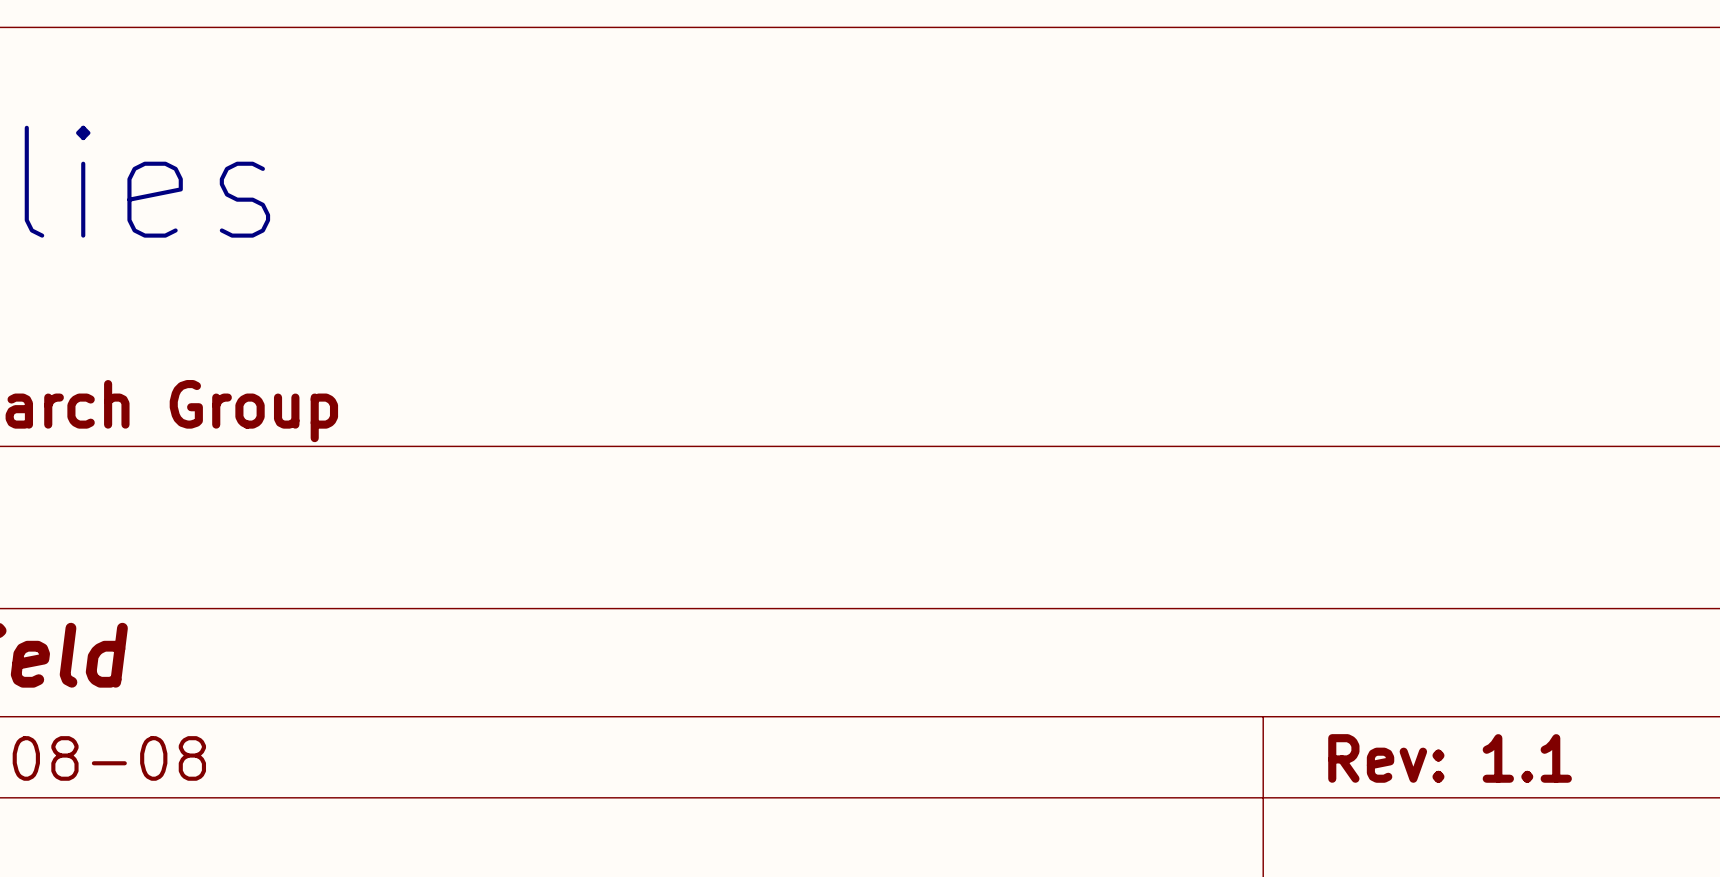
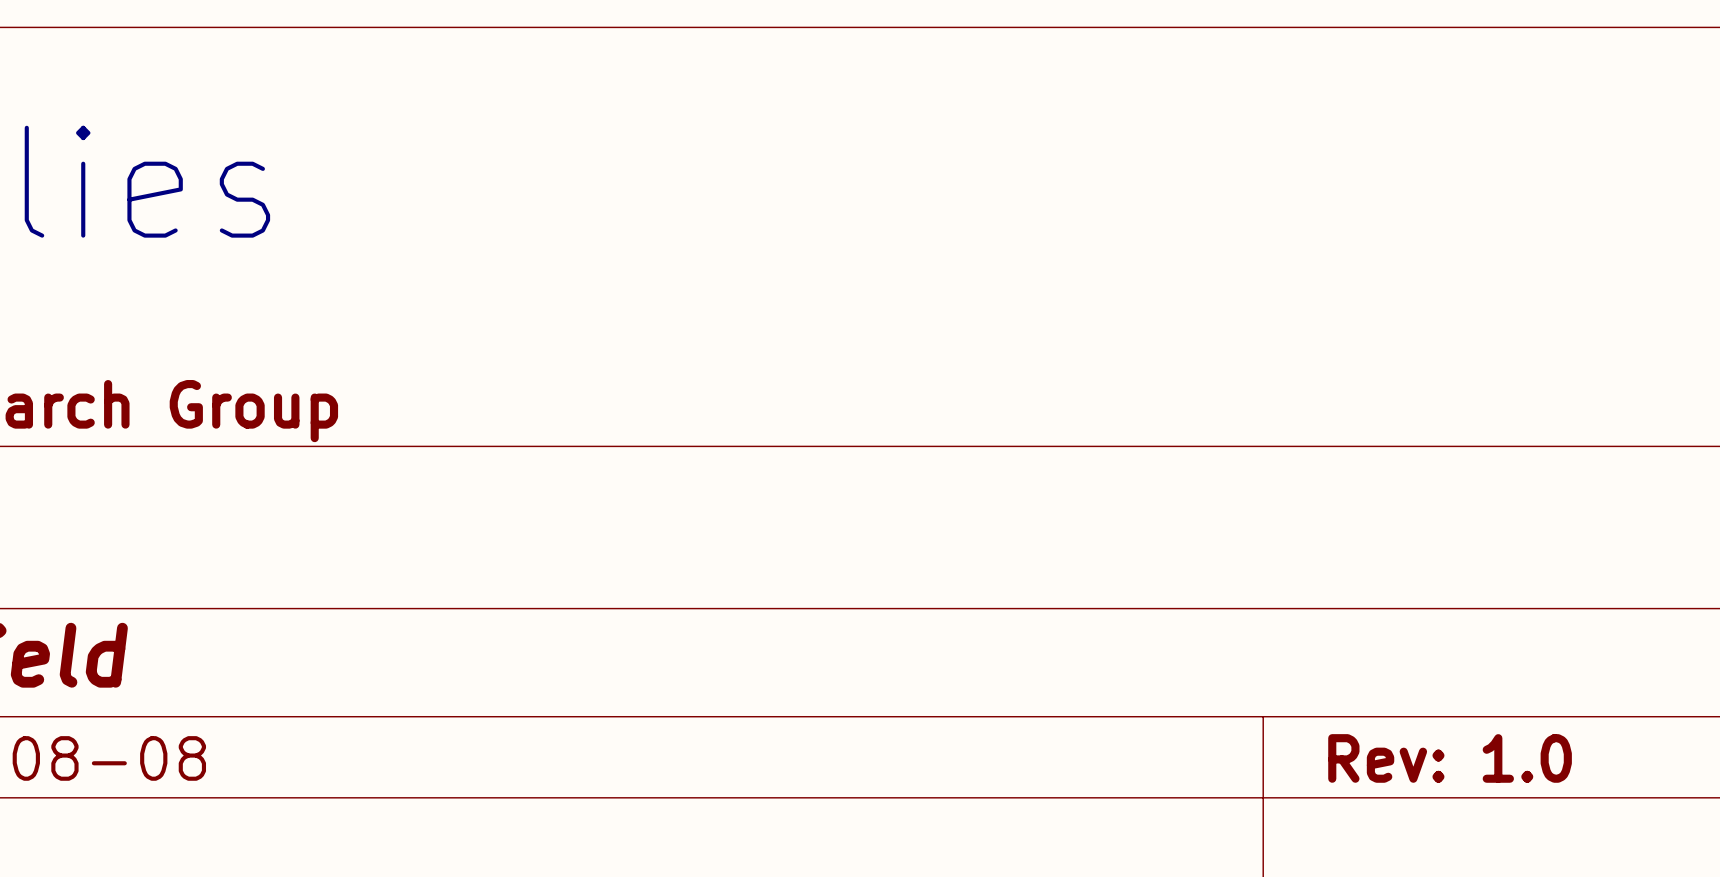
title block: Rev: 1.1 (1450, 758) -> Rev: 1.0 (1450, 758)

